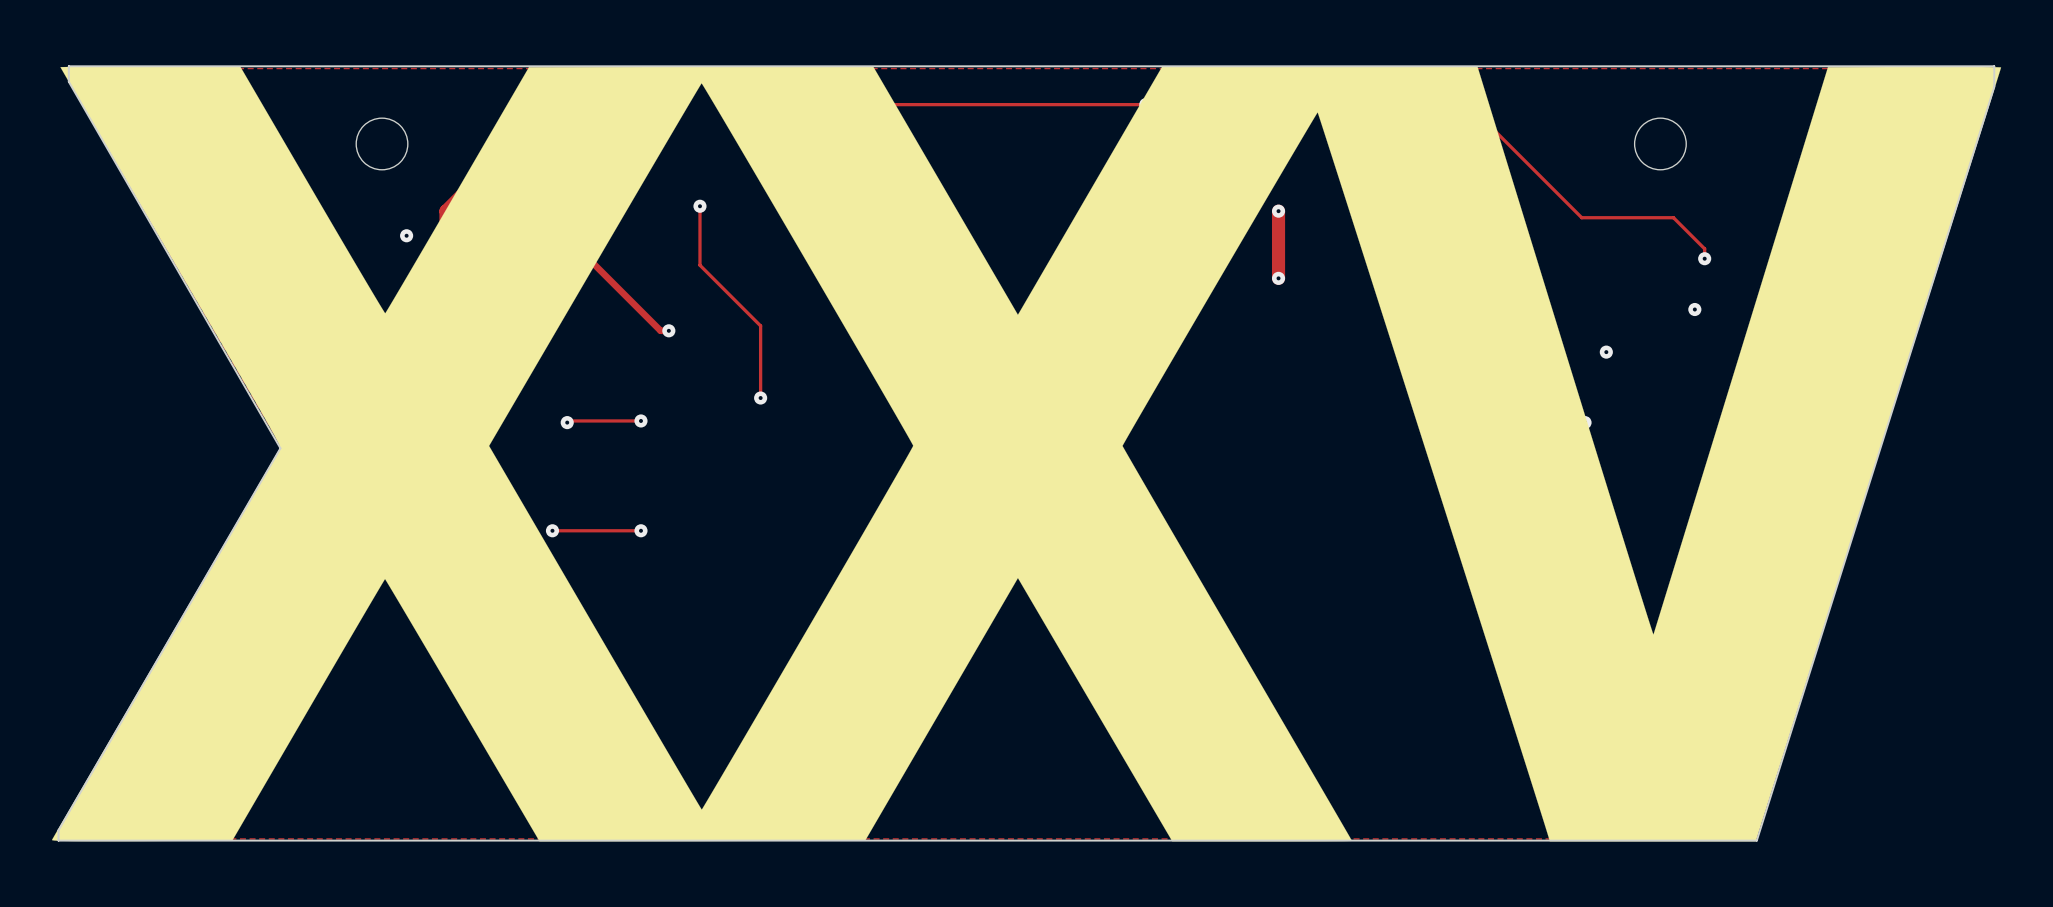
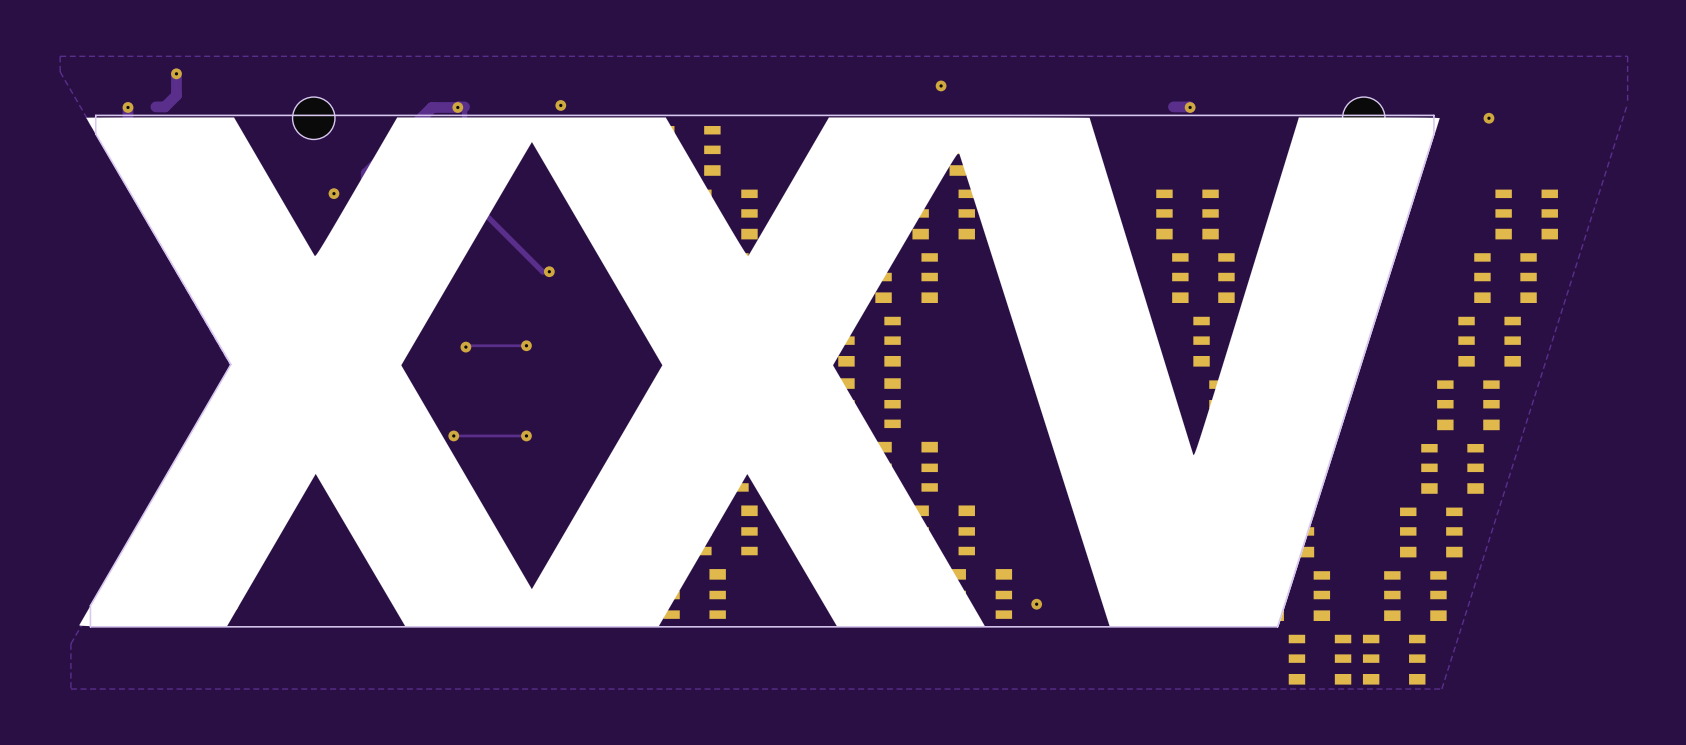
drawing: [51, 66, 2002, 842] -> none
board edge: (68, 66) (68, 81) (280, 448) (58, 830) (58, 840) (1756, 840) (1994, 86) (1994, 66) (68, 66) -> (95, 115) (95, 133) (230, 364) (90, 605) (90, 626) (1277, 626) (1433, 133) (1433, 115) (95, 115)
track: (854, 104) (1145, 104) -> none
track: (1468, 104) (1581, 217) (1673, 217) (1704, 248) (1704, 258) -> none
via: none -> (560, 105)
drawing: none -> [79, 117, 1440, 627]
track: (699, 206) (699, 265) (760, 325) (760, 398) -> none
via: (699, 206) -> none
track: (1278, 211) (1278, 278) -> none
via: (1704, 258) -> none
via: (1694, 309) -> none
via: (1606, 352) -> none
via: (760, 398) -> none

